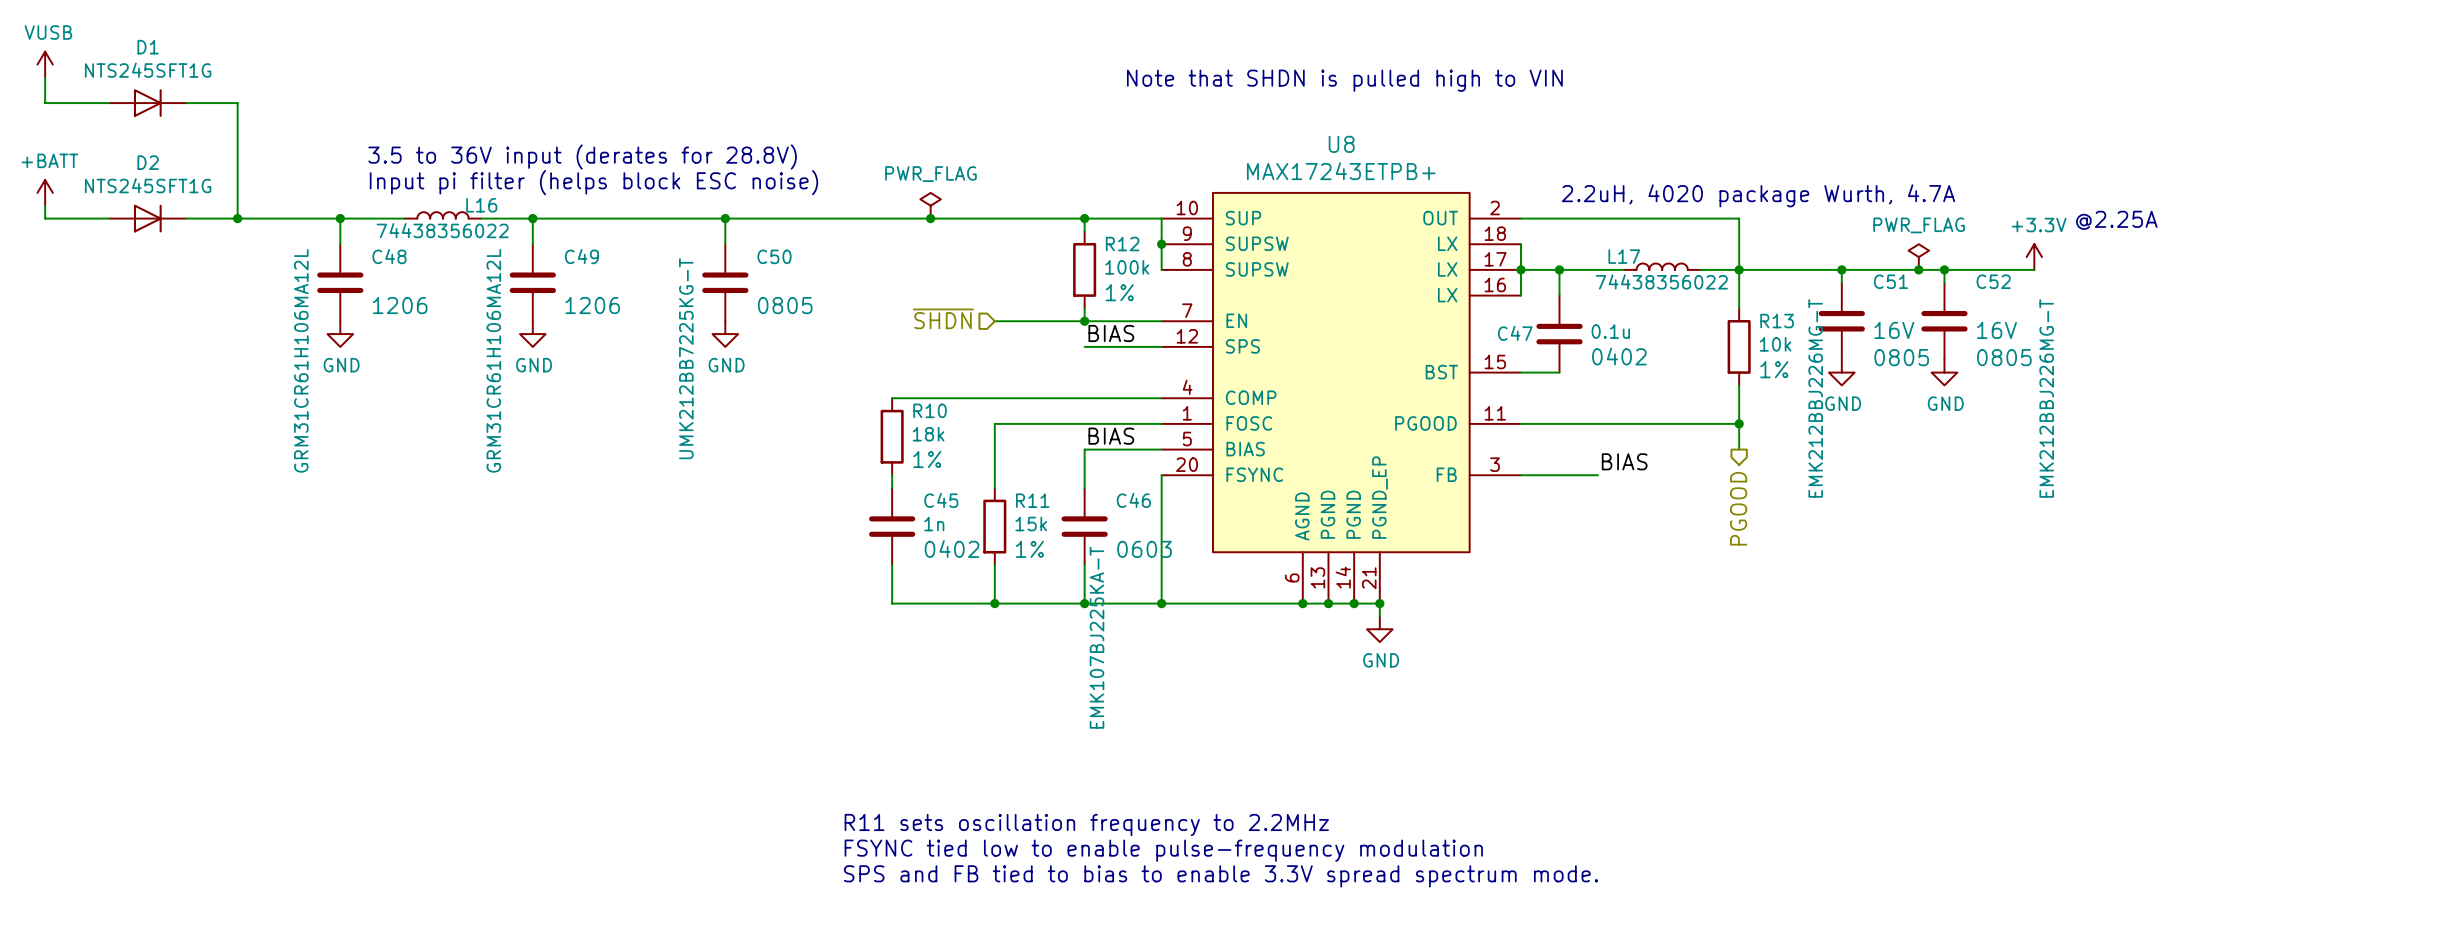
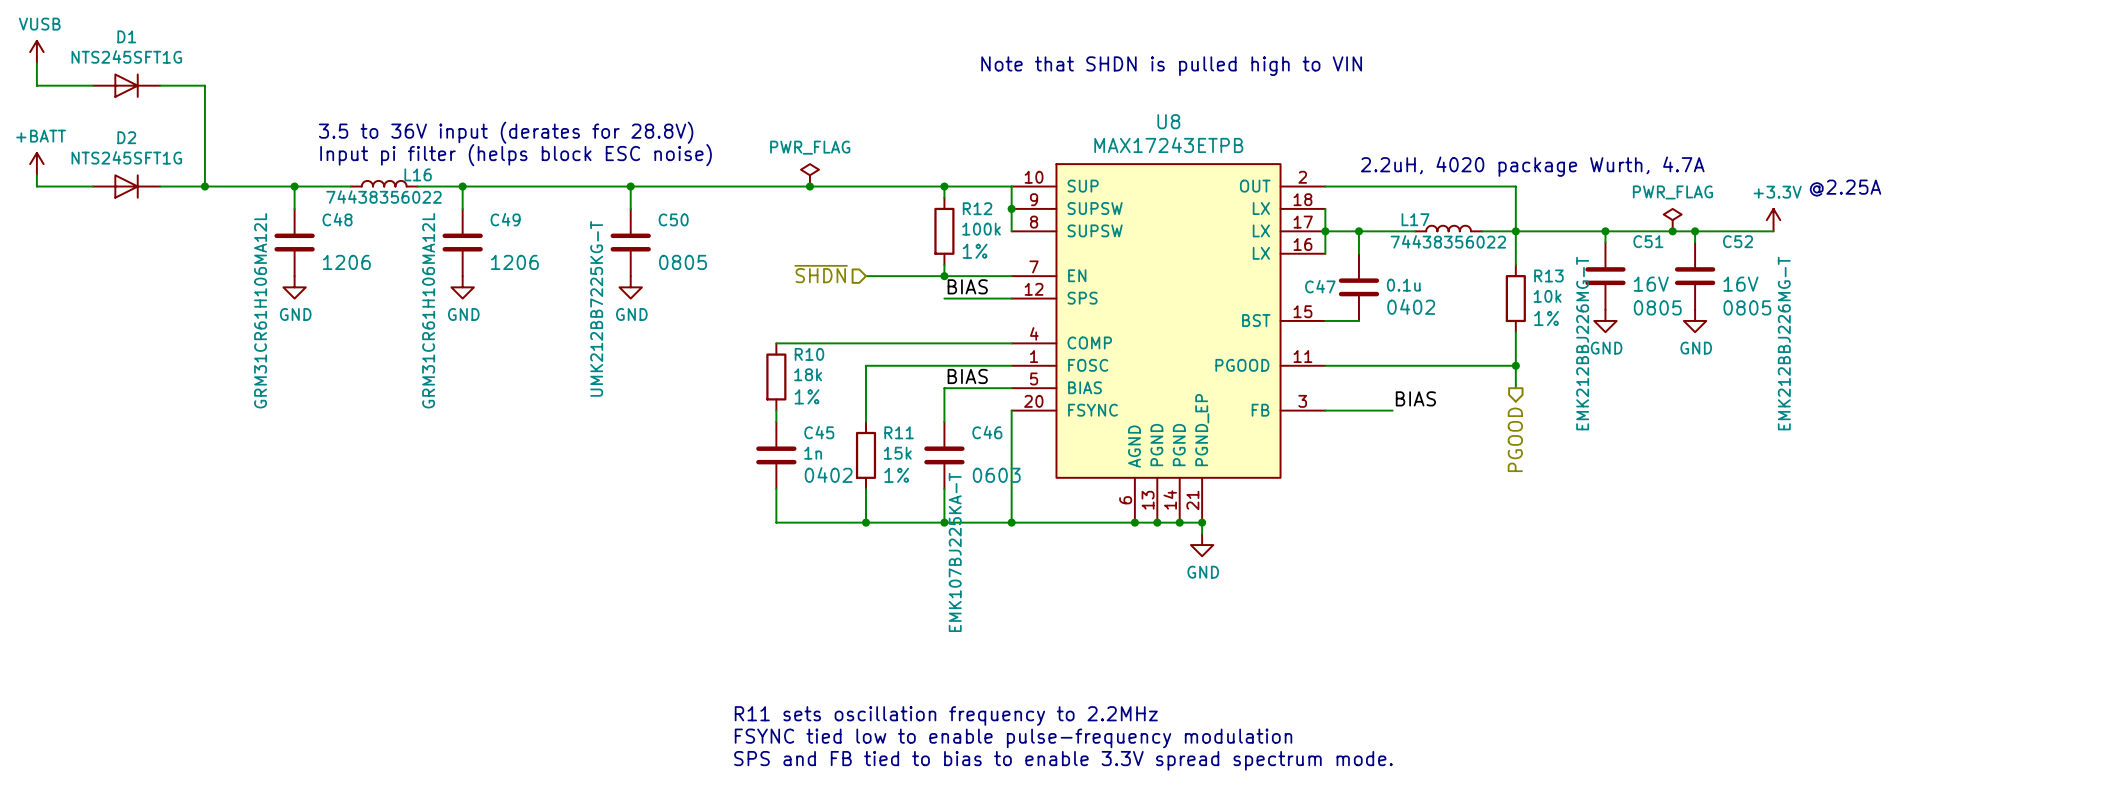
U8 value: MAX17243ETPB+ (1341, 171) -> MAX17243ETPB (1168, 145)

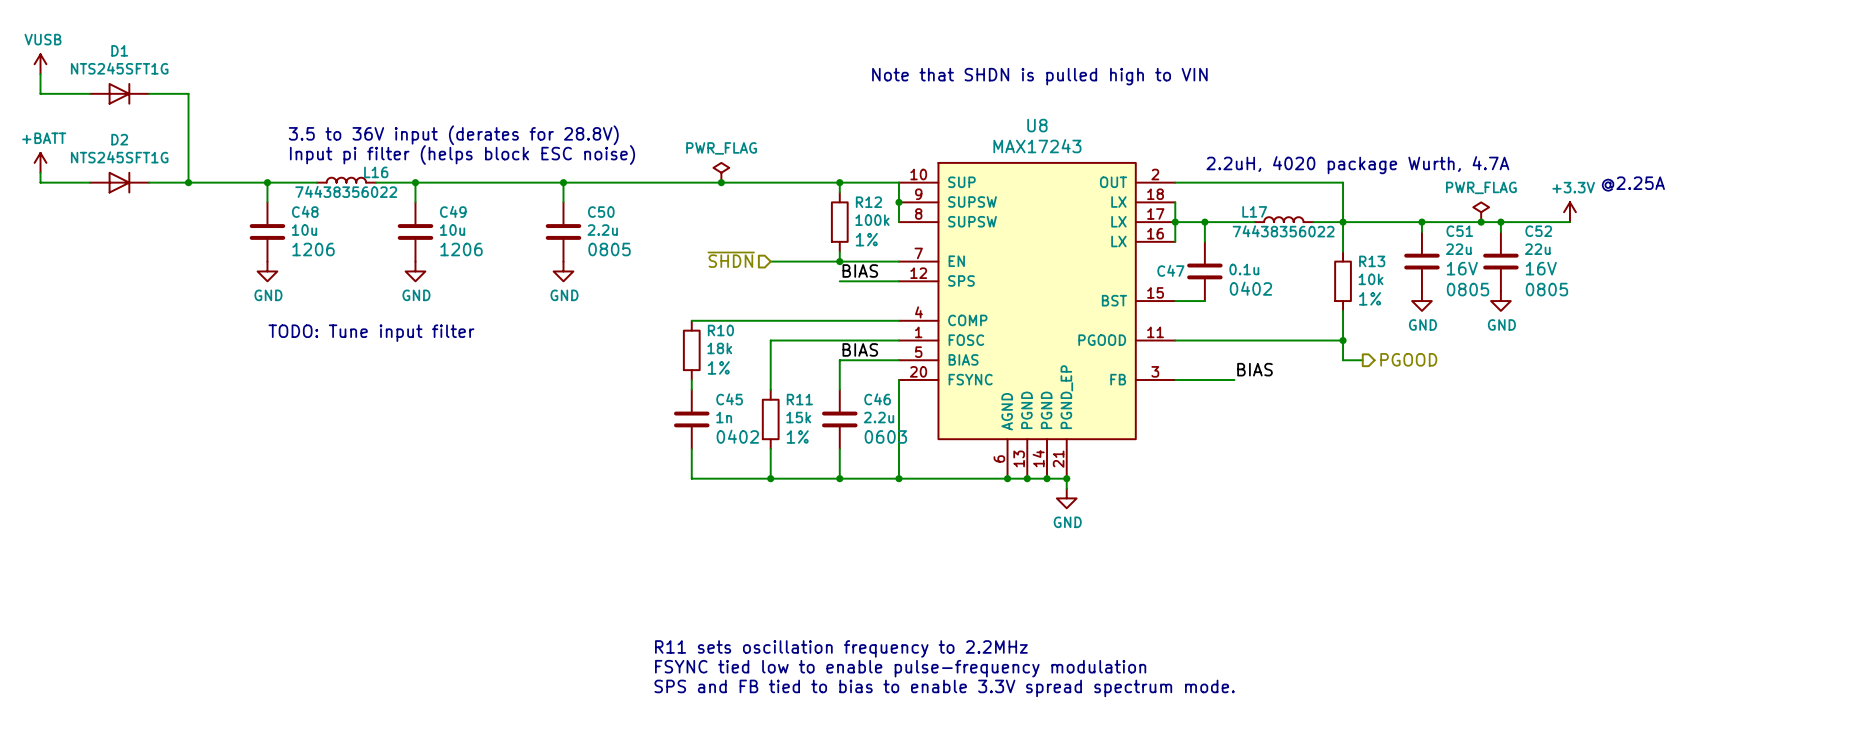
U8 value: MAX17243ETPB (1168, 145) -> MAX17243 (1037, 146)
C50 value: UMK212BB7225KG-T (596, 308) -> 2.2u (602, 230)
C48 value: GRM31CR61H106MA12L (260, 310) -> 10u (304, 230)
C49 value: GRM31CR61H106MA12L (428, 310) -> 10u (452, 230)
C51 value: EMK212BBJ226MG-T (1582, 343) -> 22u (1458, 249)
C52 value: EMK212BBJ226MG-T (1784, 343) -> 22u (1537, 249)
text: none -> TODO: Tune input filter (371, 333)
wire: none -> (1343, 360) (1362, 360)
hierarchical label rotation: 0° (1515, 439) -> 90° counterclockwise (1408, 359)
hierarchical label position: PGOOD (1515, 439) -> PGOOD (1408, 359)
C46 value: EMK107BJ225KA-T (955, 552) -> 2.2u (879, 417)

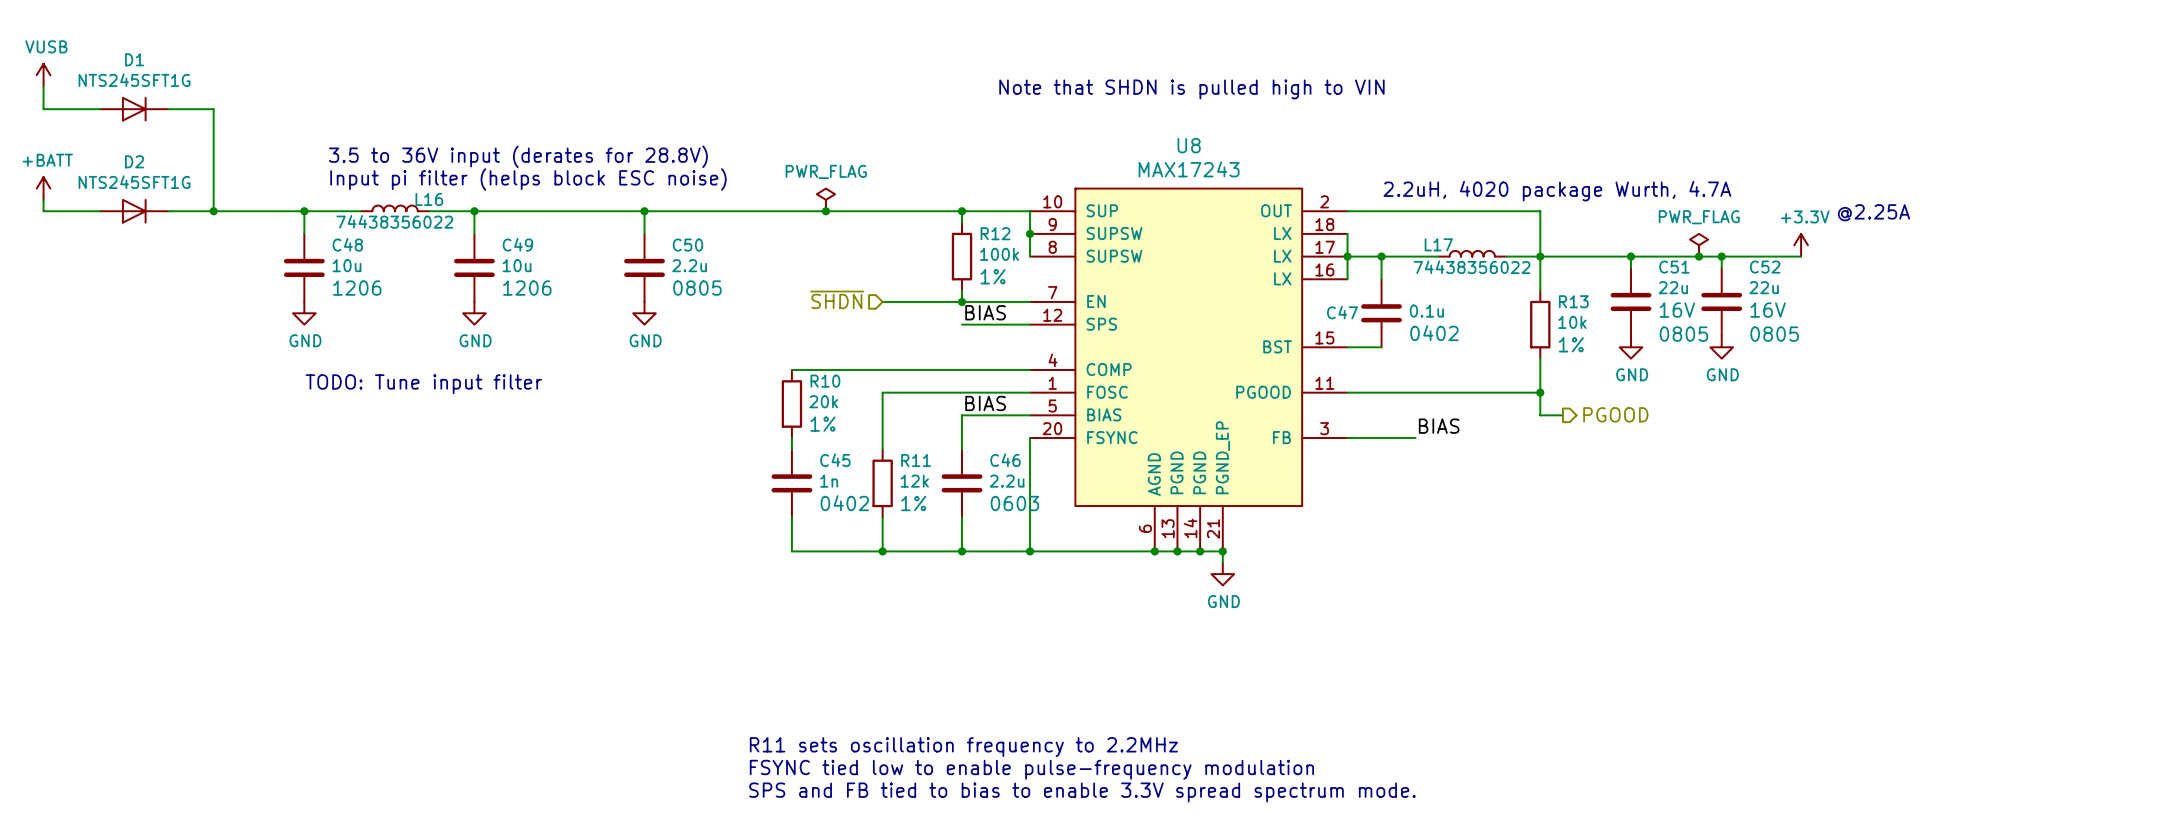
R10 value: 18k (719, 348) -> 20k (823, 401)
R11 value: 15k (798, 417) -> 12k (914, 481)

